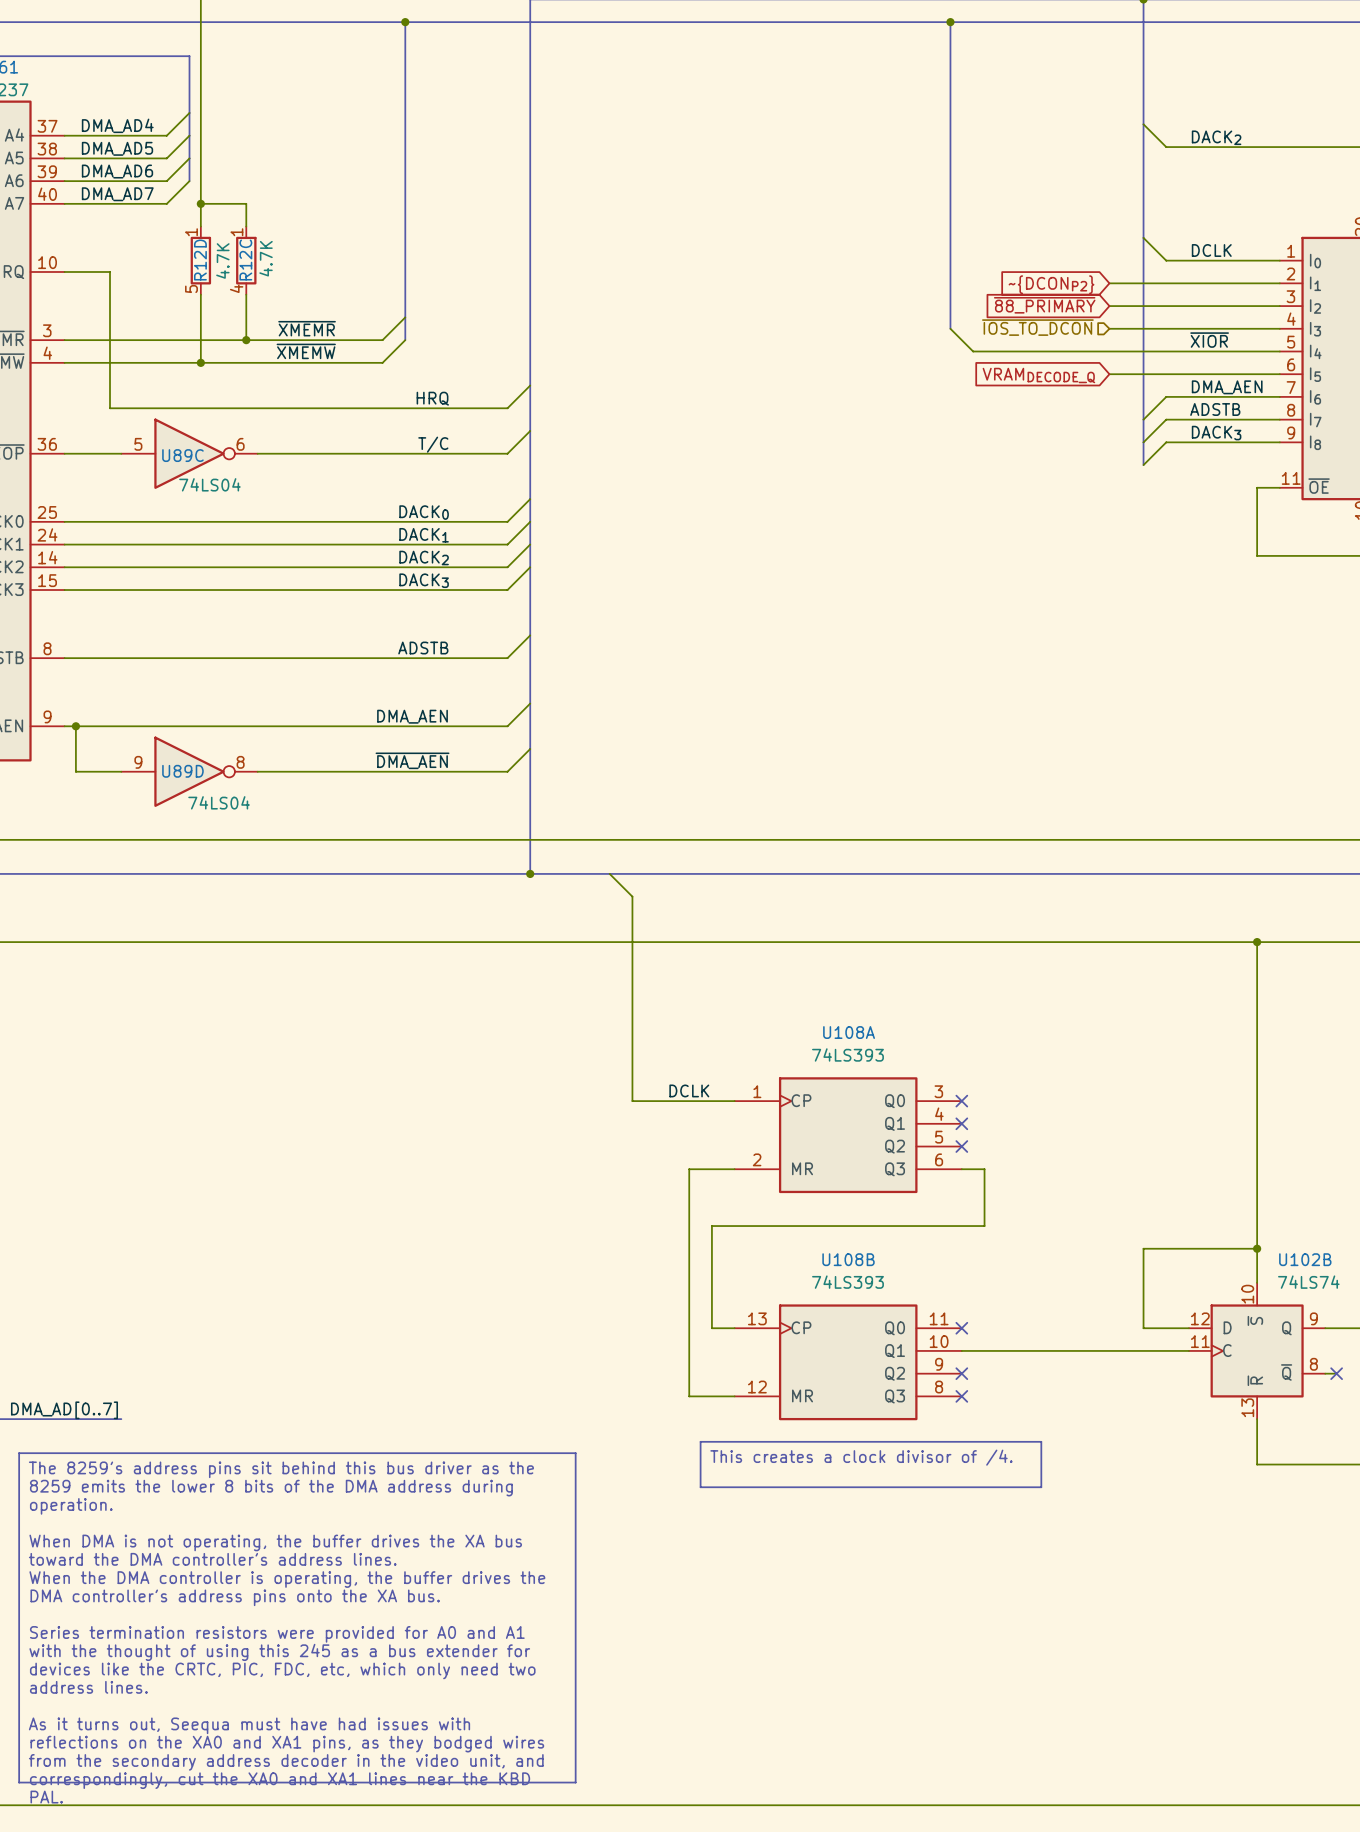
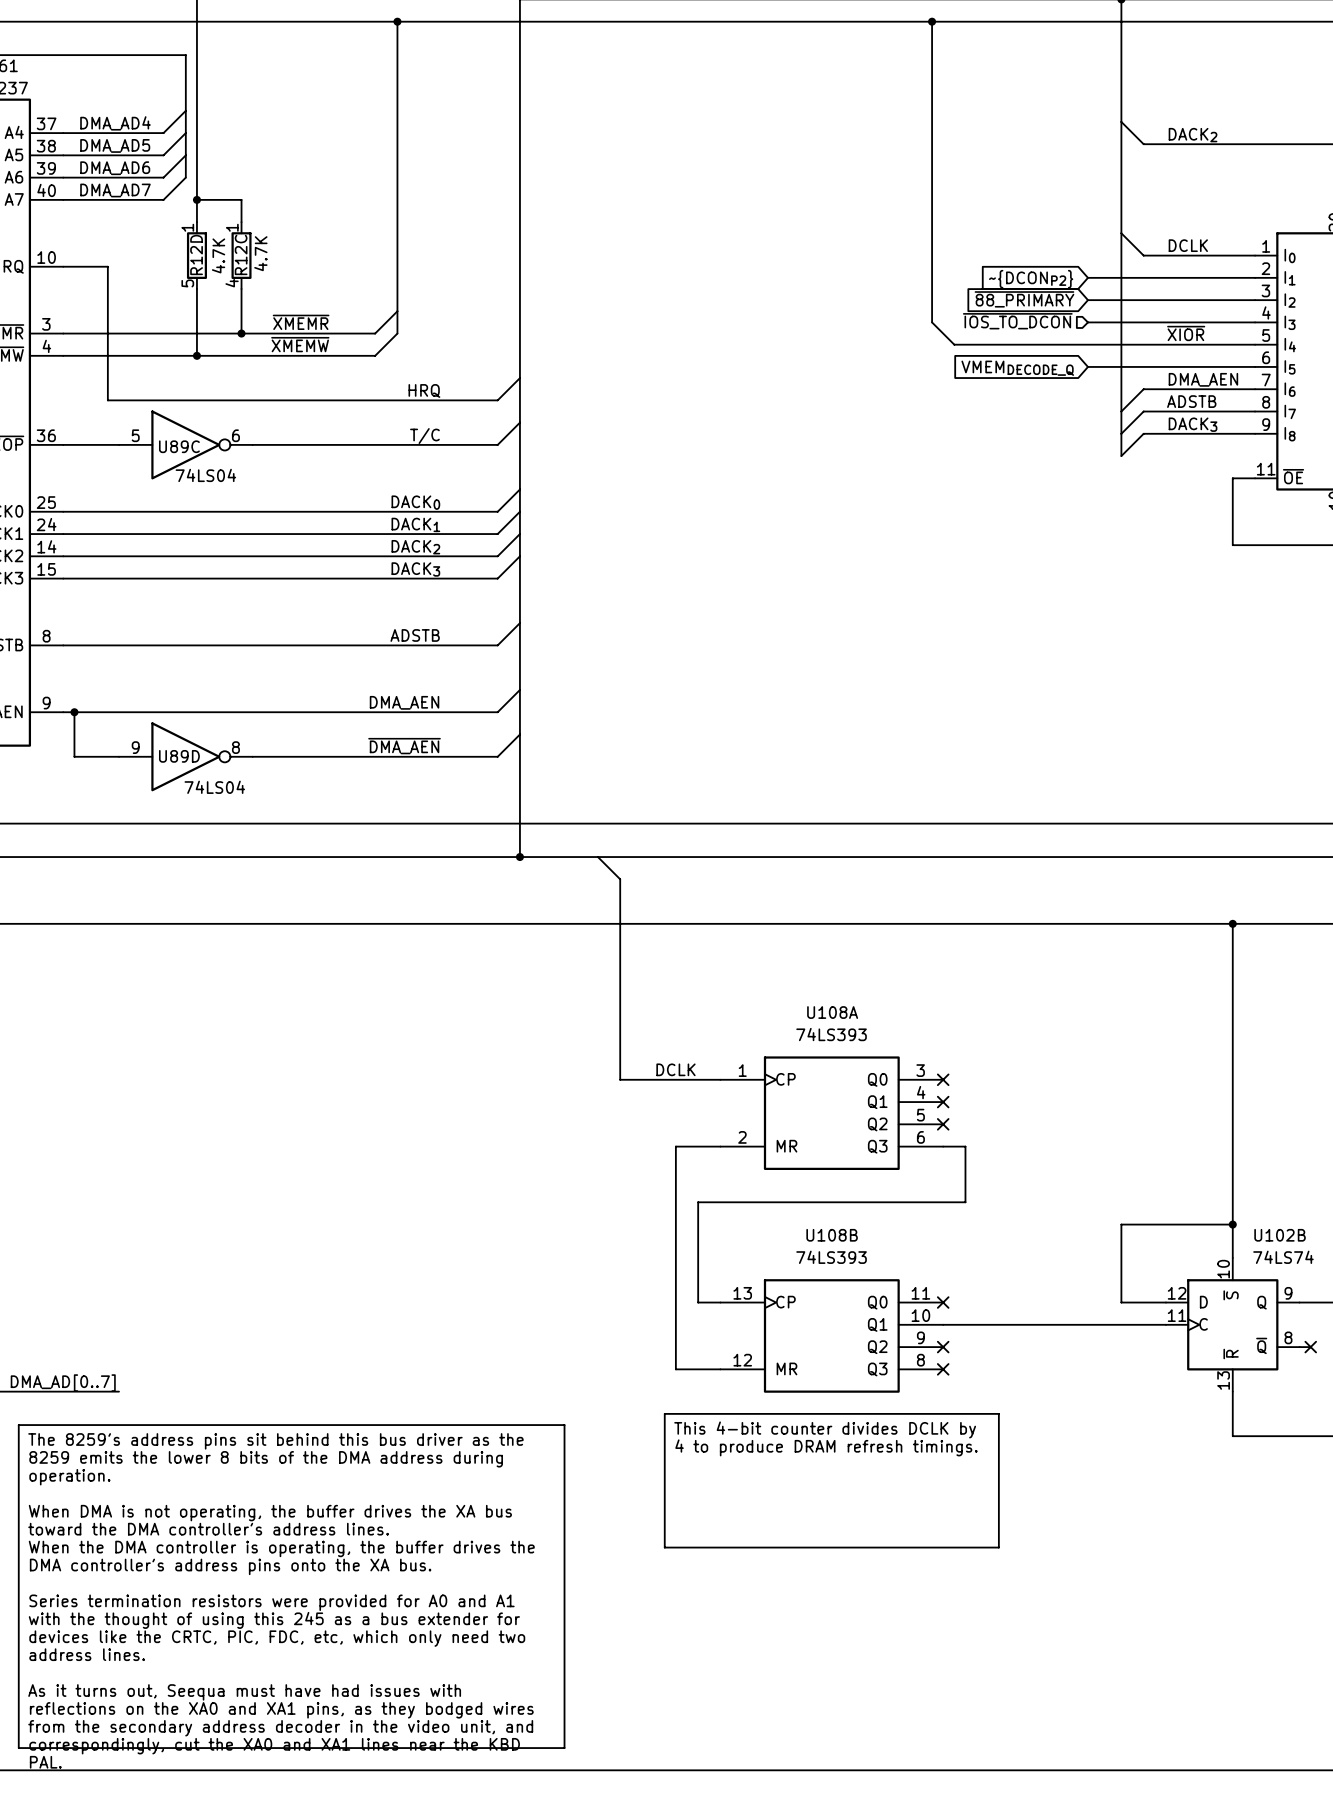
global label: VRAMDECODE_Q (1038, 375) -> VMEMDECODE_Q (1017, 368)
line: (700, 1441) (700, 1487) (1041, 1487) (1041, 1441) (1018, 1441) -> (687, 1413) (664, 1413) (664, 1547) (998, 1547) (998, 1413)
text: This creates a clock divisor of /4. (861, 1457) -> none
text: none -> This 4-bit counter divides DCLK by (825, 1429)
text: none -> 4 to produce DRAM refresh timings. (826, 1447)

